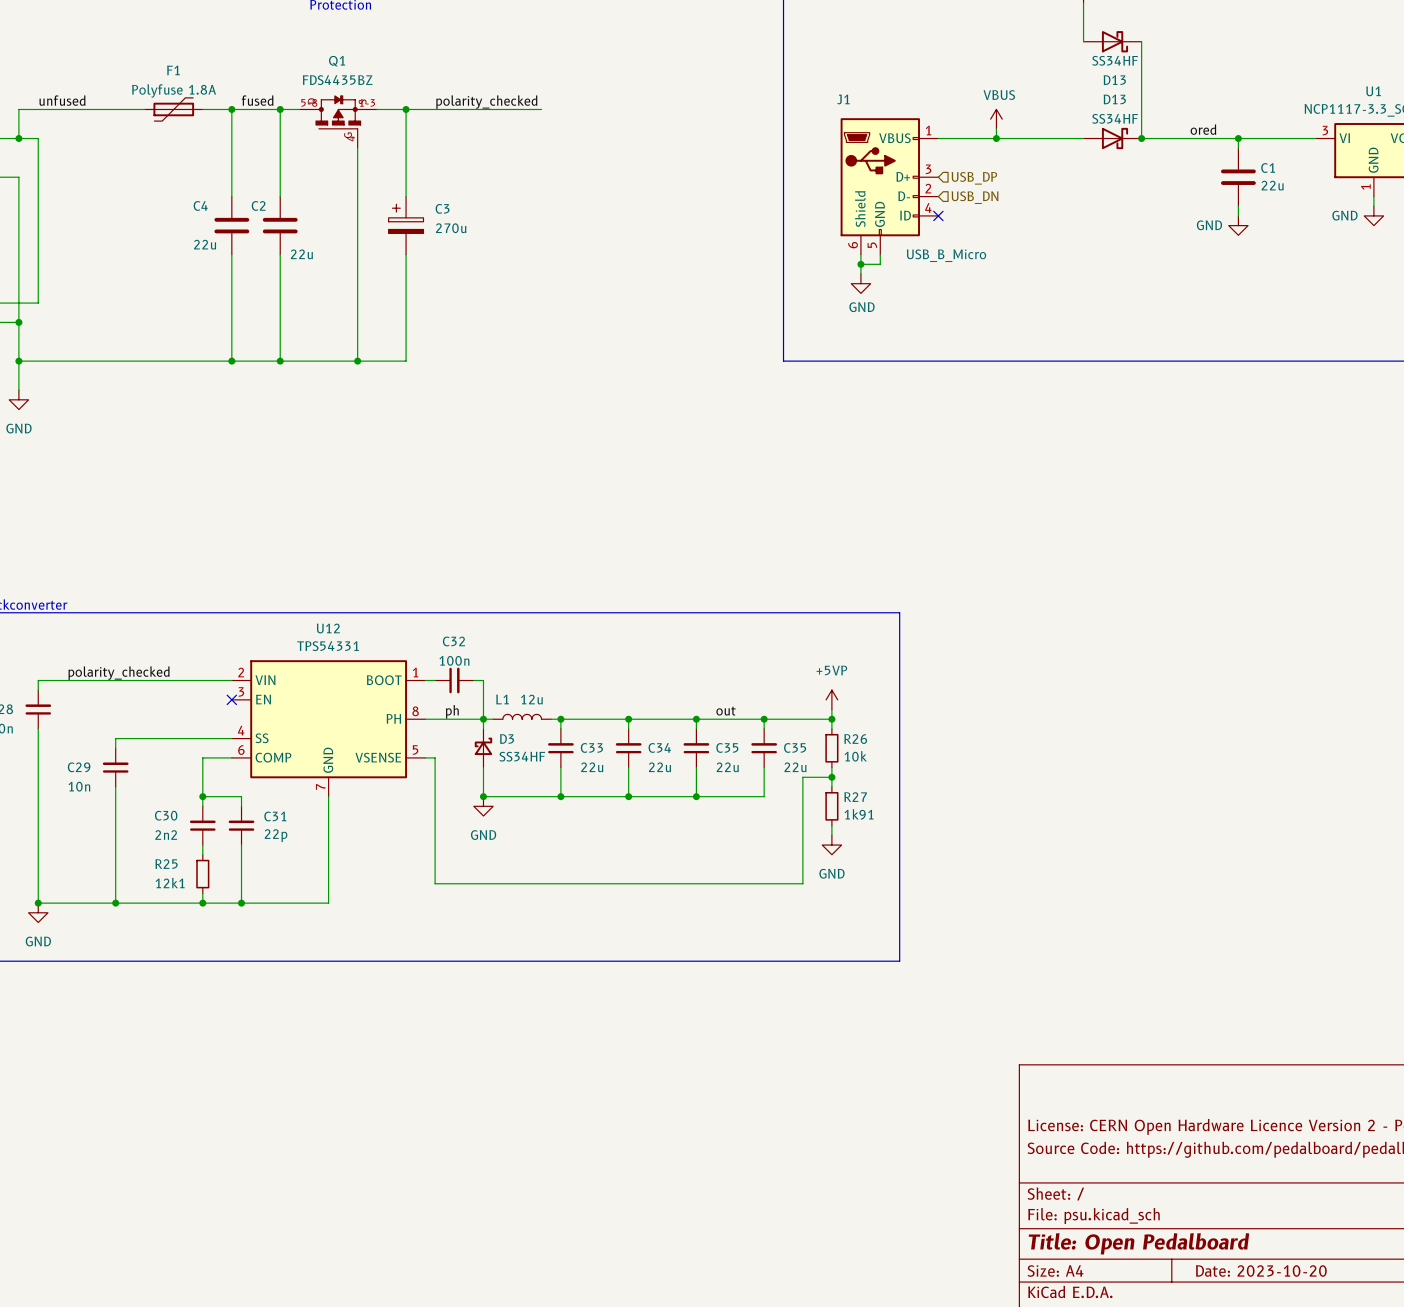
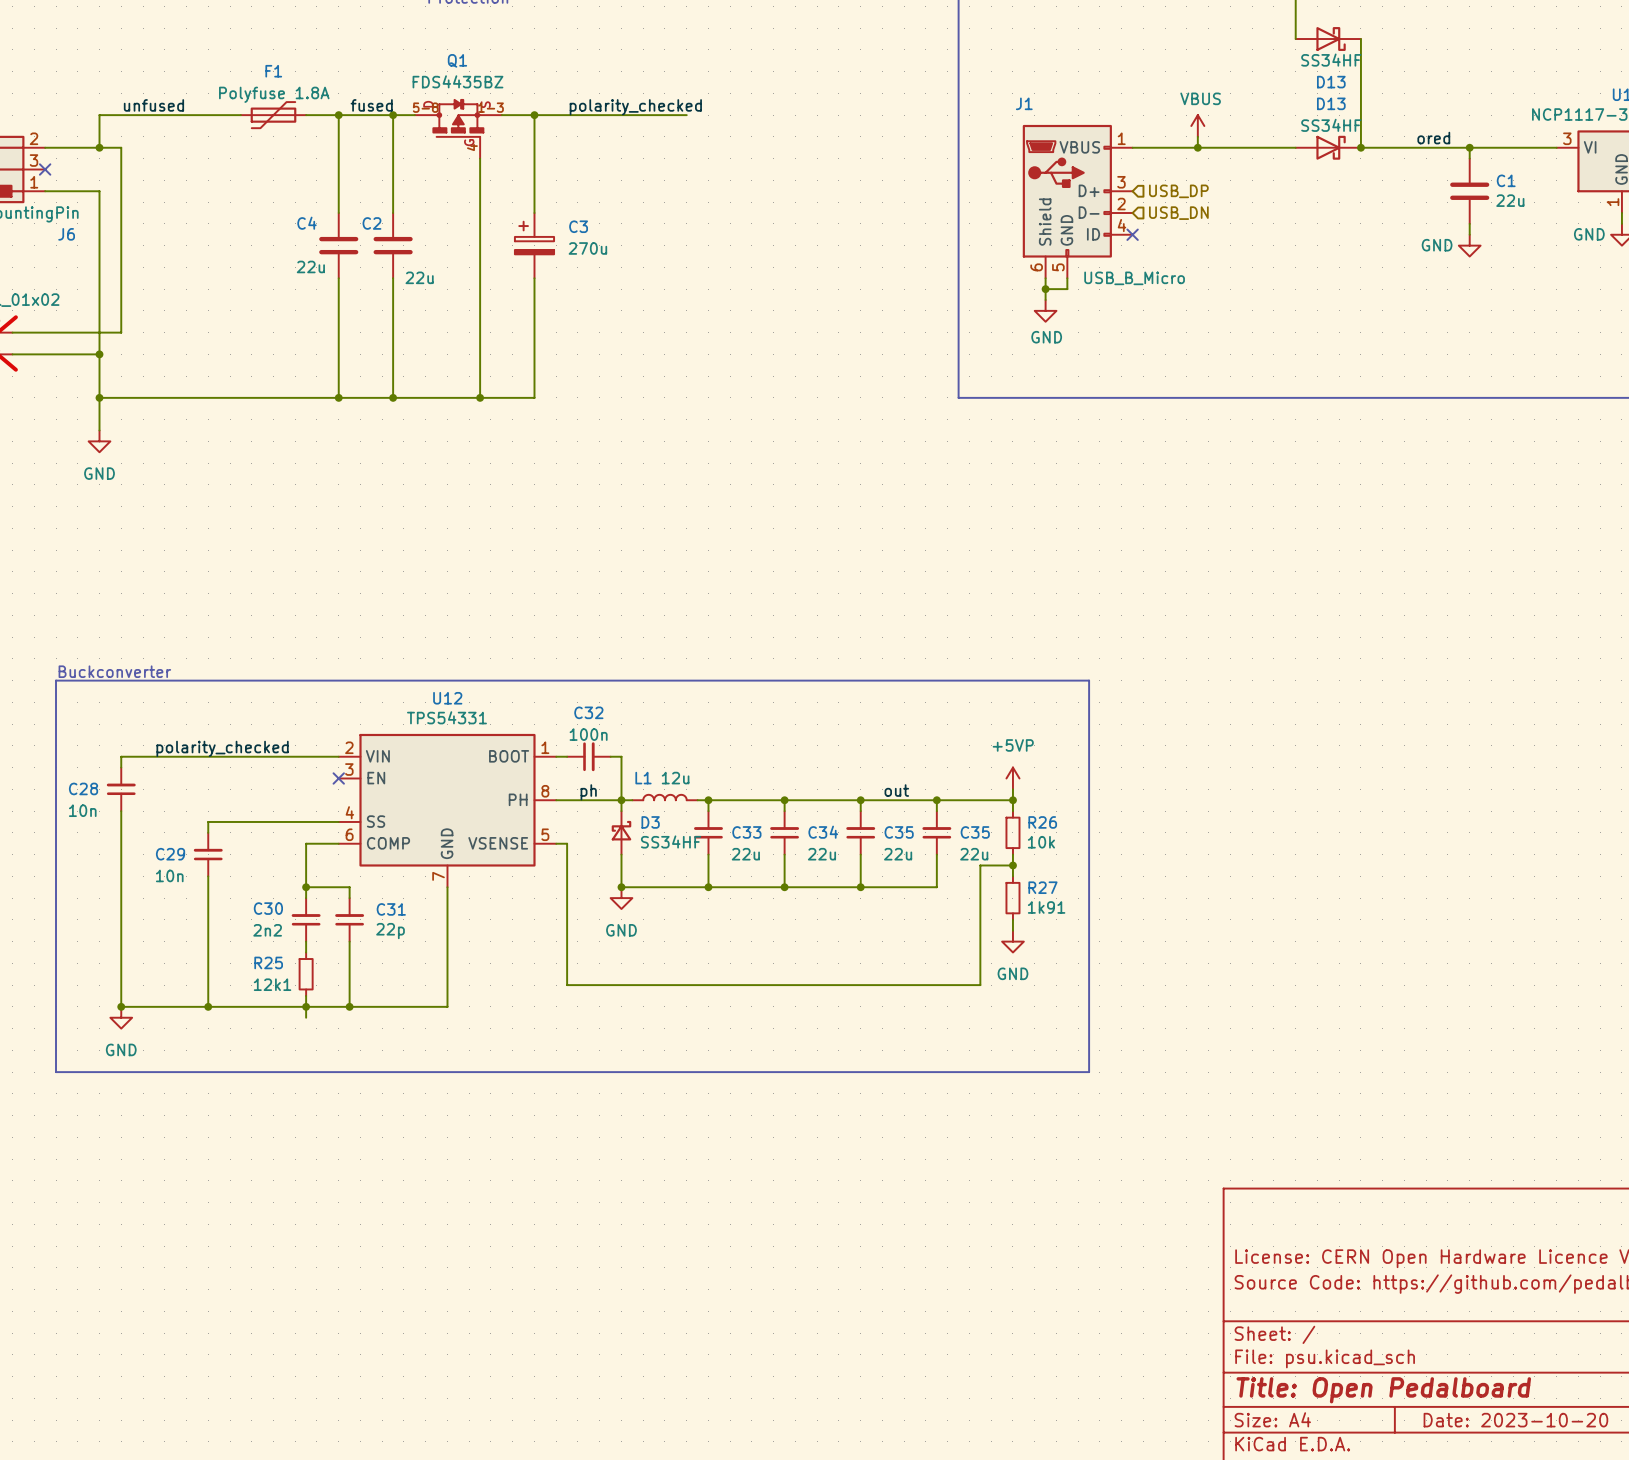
wire: none -> (306, 1006) (306, 1017)

